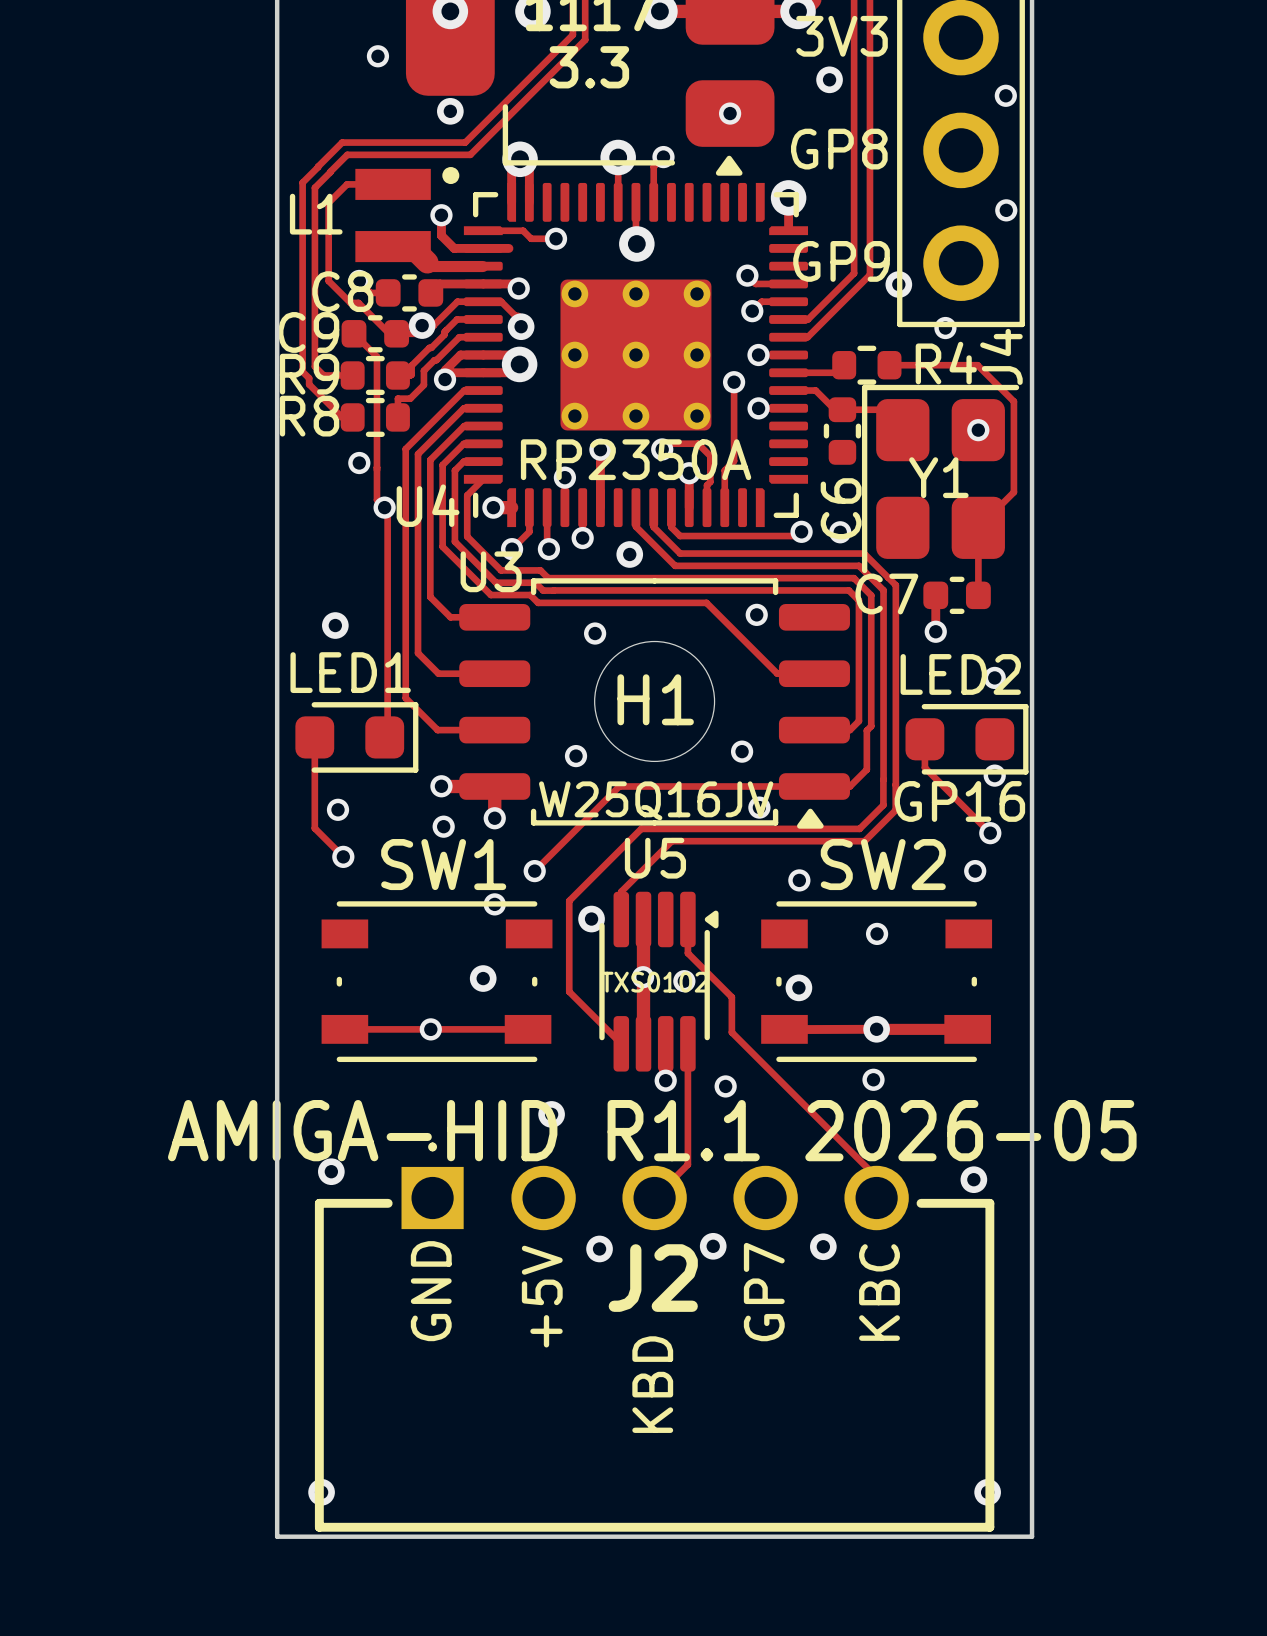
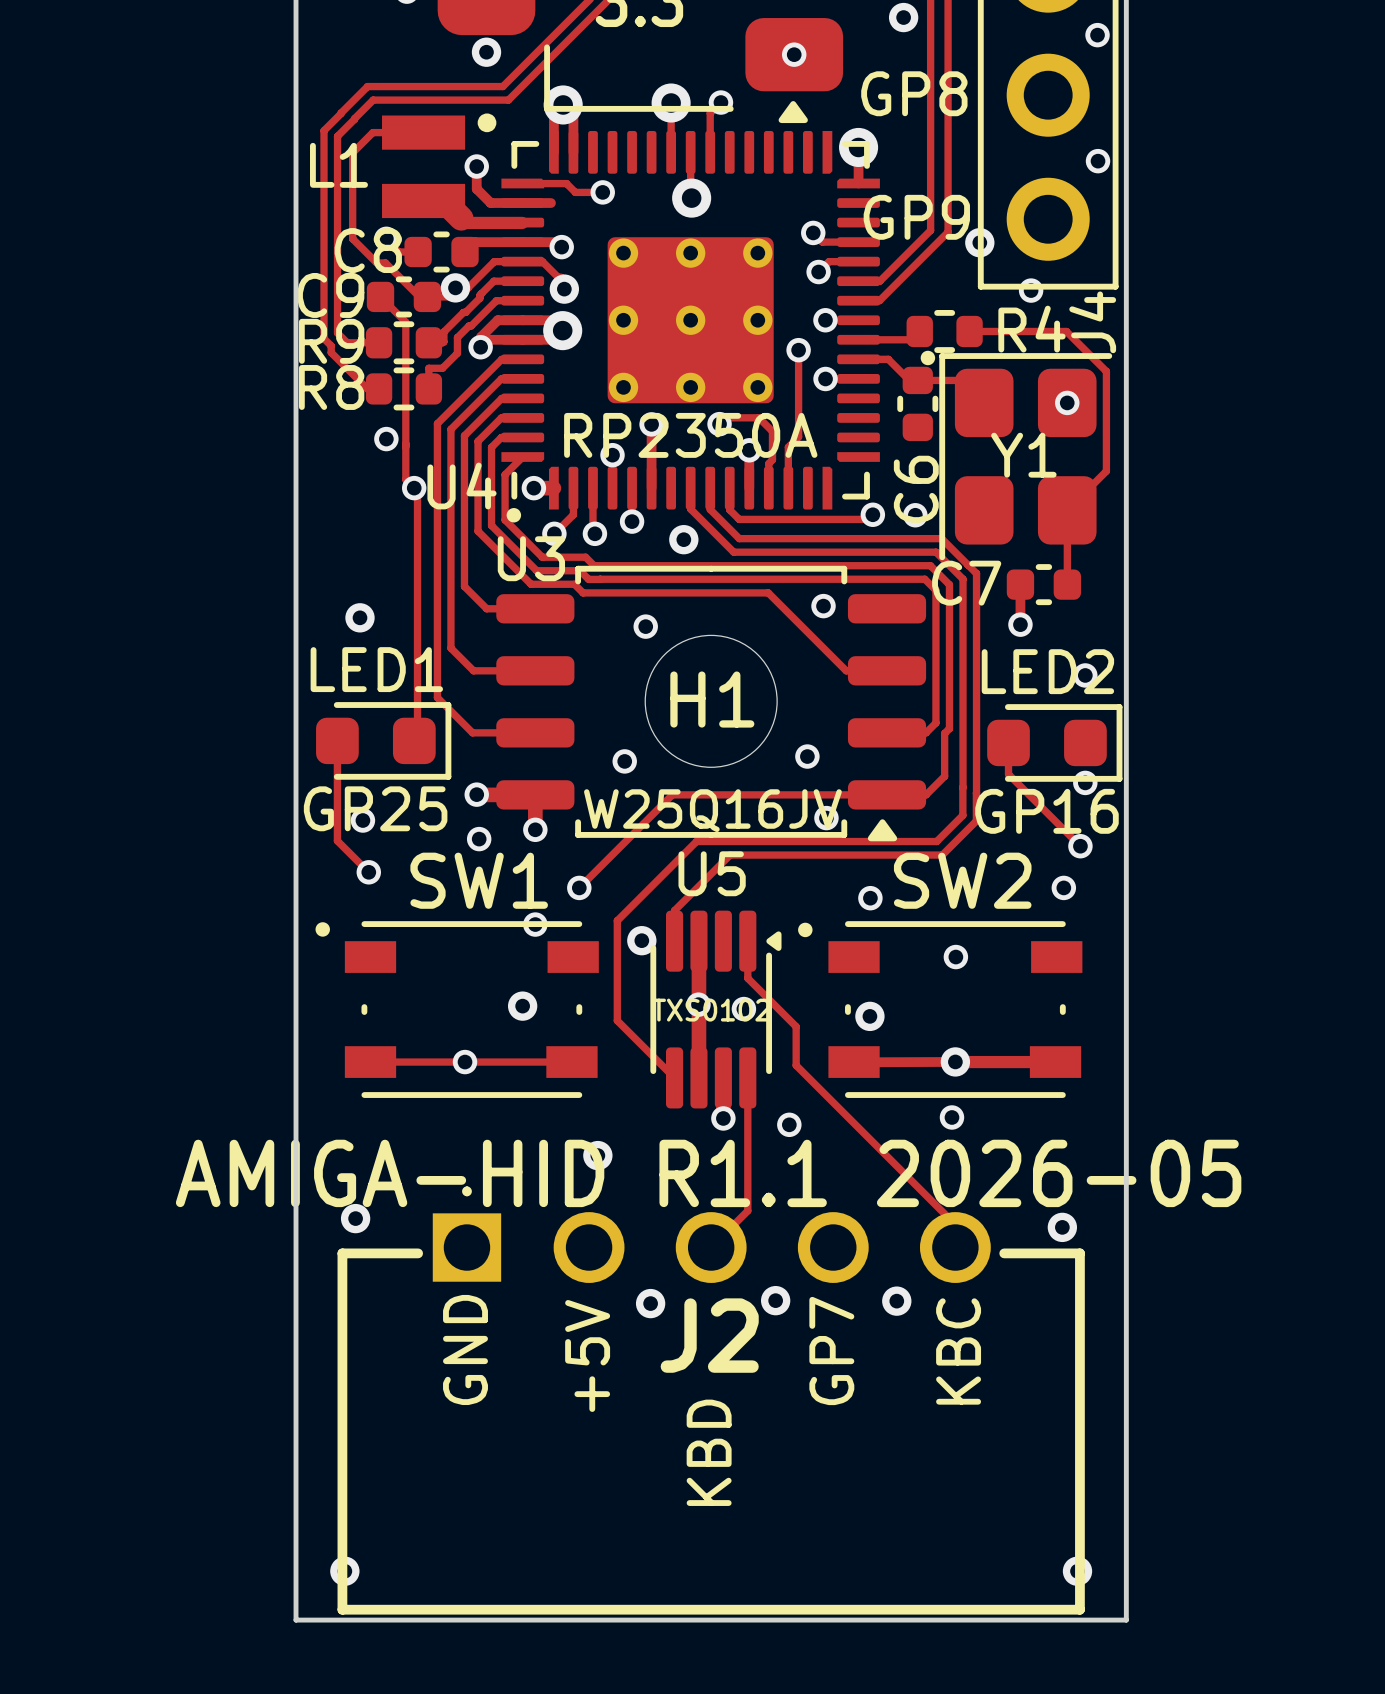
drawing: none -> [920, 350, 936, 366]
drawing: none -> [506, 508, 522, 523]
text: none -> GP25 (375, 808)
drawing: none -> [315, 922, 330, 937]
drawing: none -> [798, 922, 813, 938]

